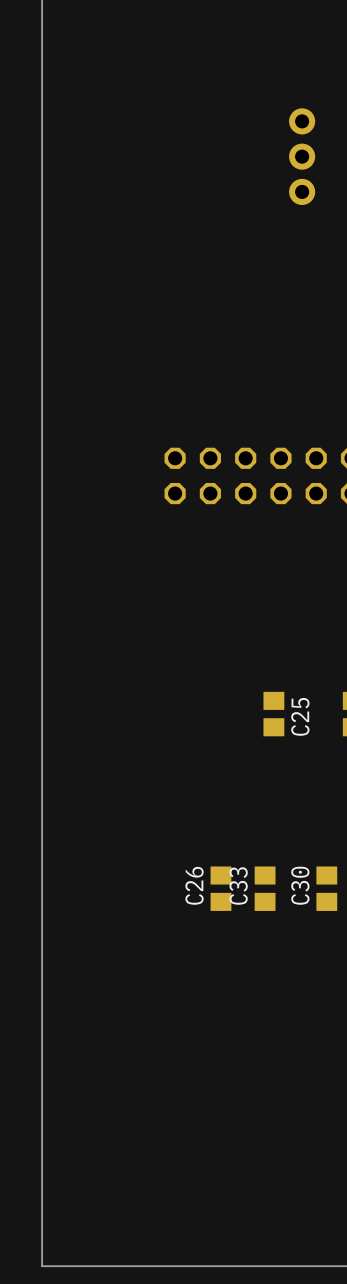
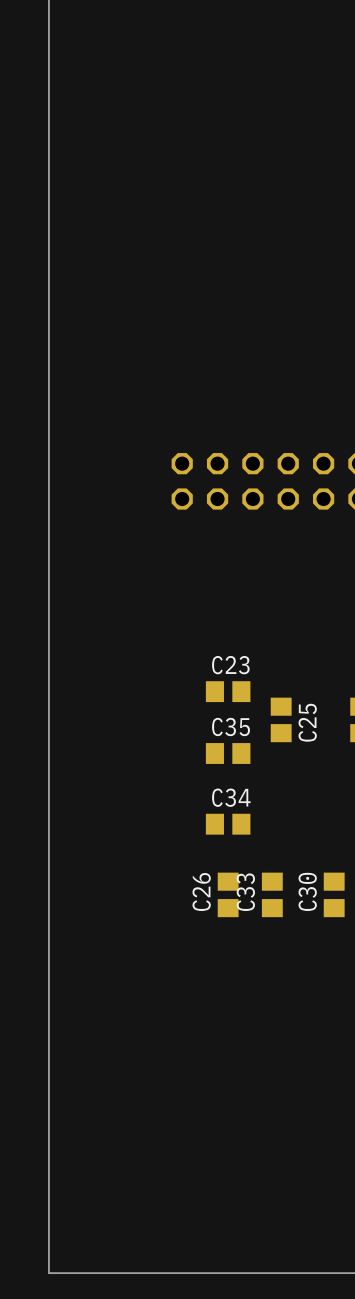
part: (302, 156) -> none
C23: none -> (228, 691)
C35: none -> (228, 753)
C34: none -> (228, 824)

